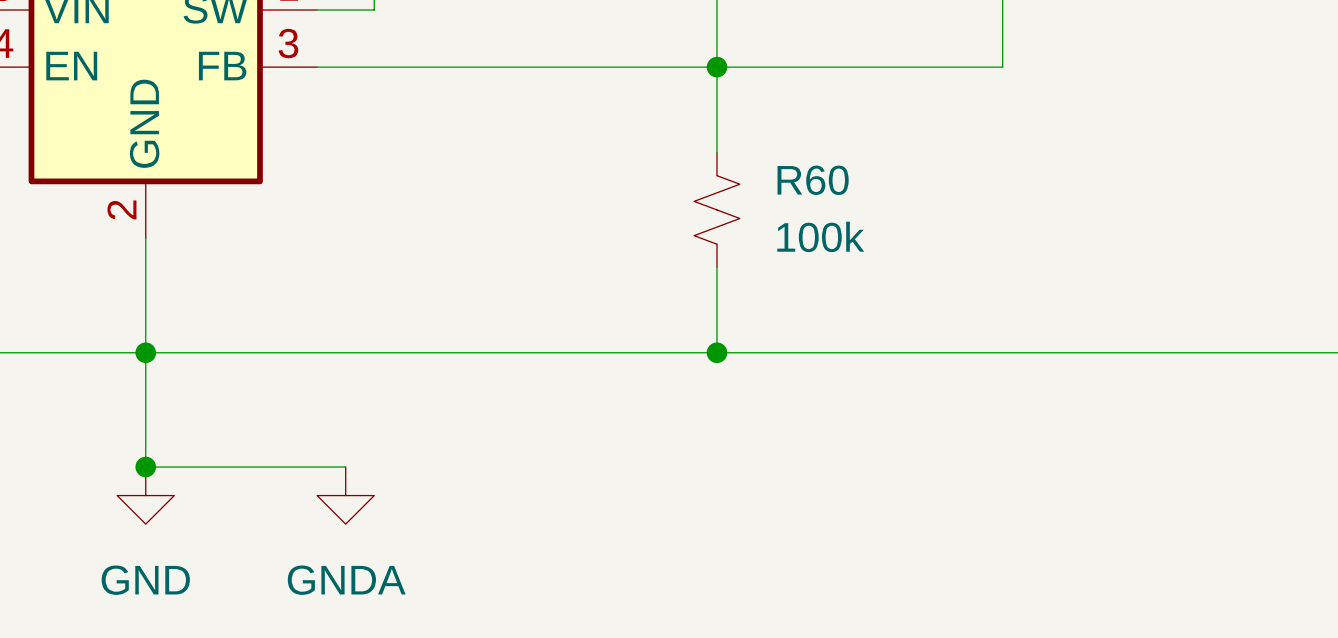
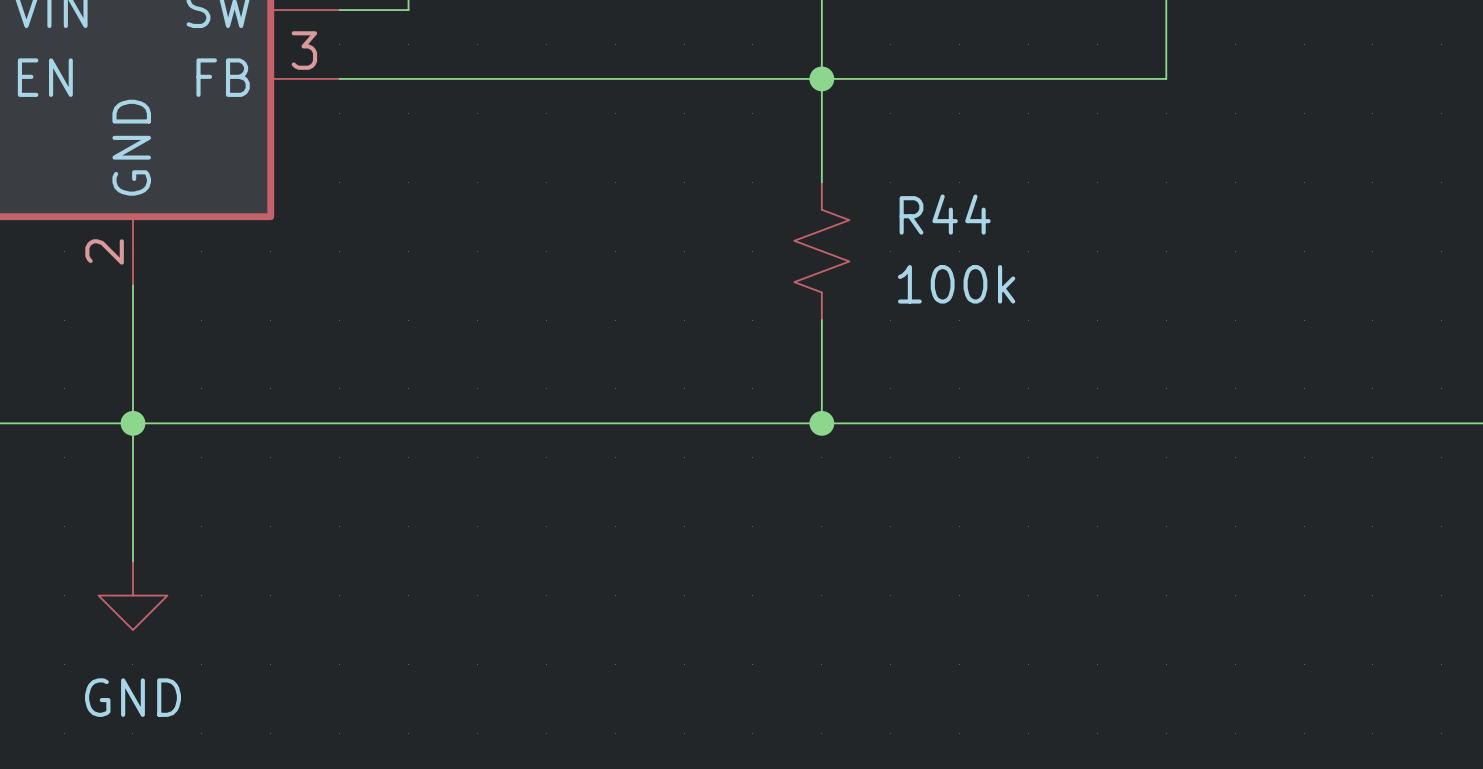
R60 name: R60 (813, 180) -> R44 (945, 214)
wire: (145, 467) (345, 467) -> none
junction: (145, 467) -> none
power symbol: GNDA (345, 495) -> none

